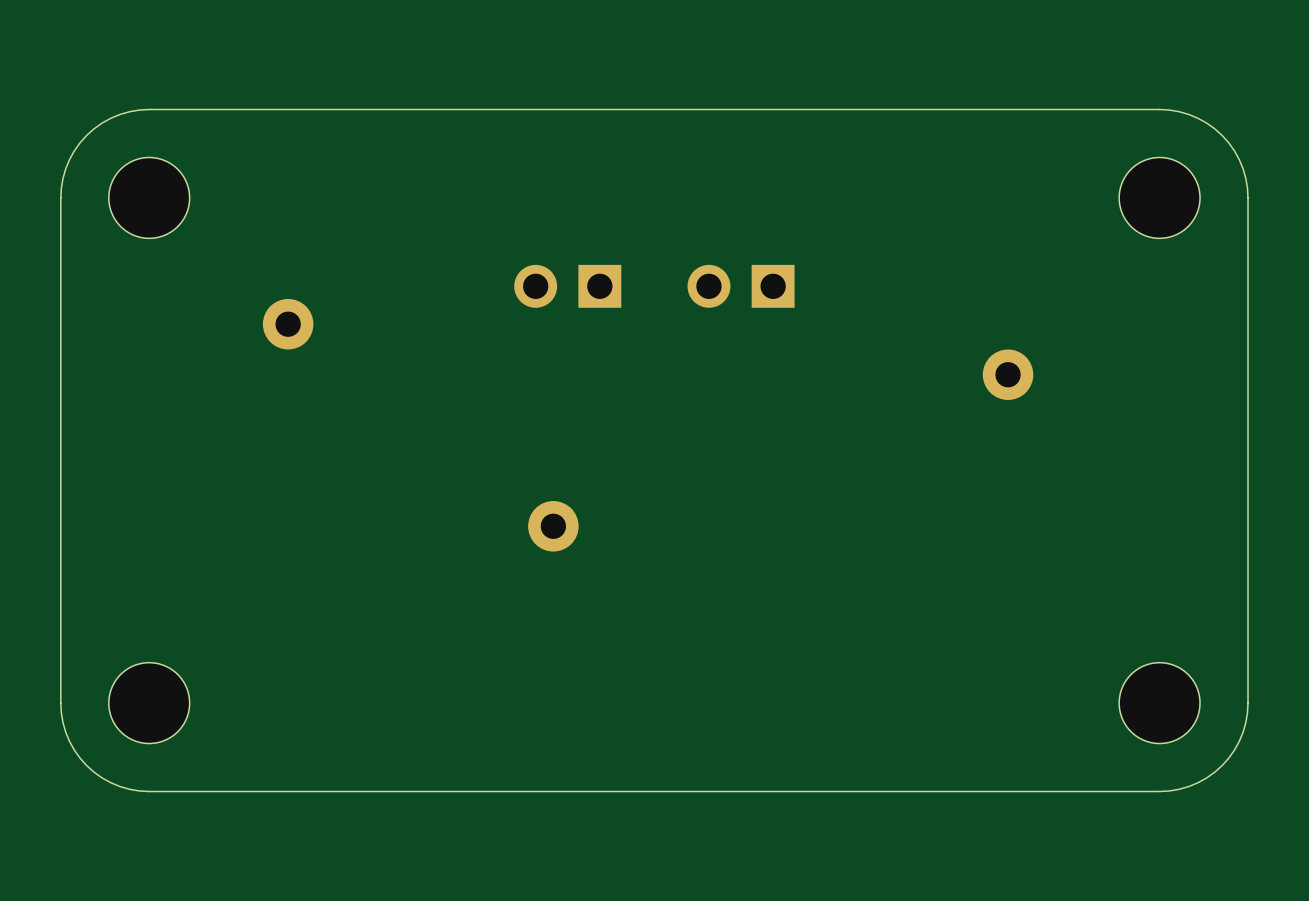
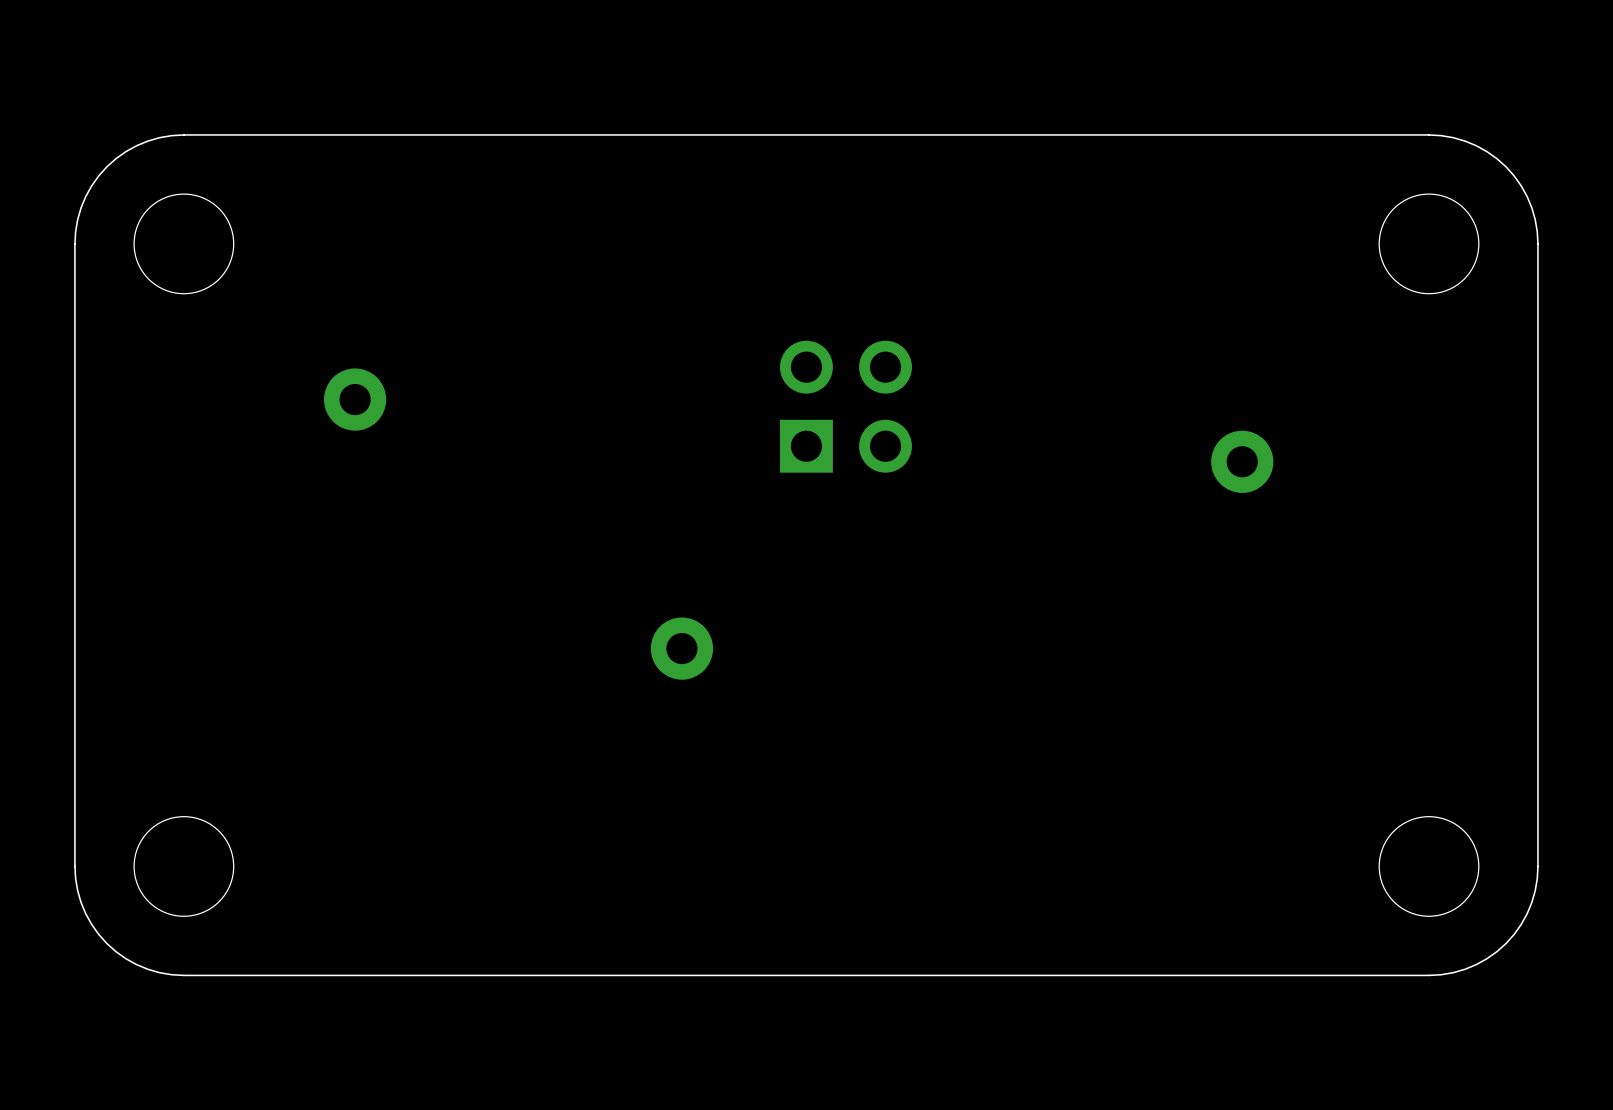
part: (567, 286) -> none
part: (741, 286) -> none
part: none -> (845, 406)

